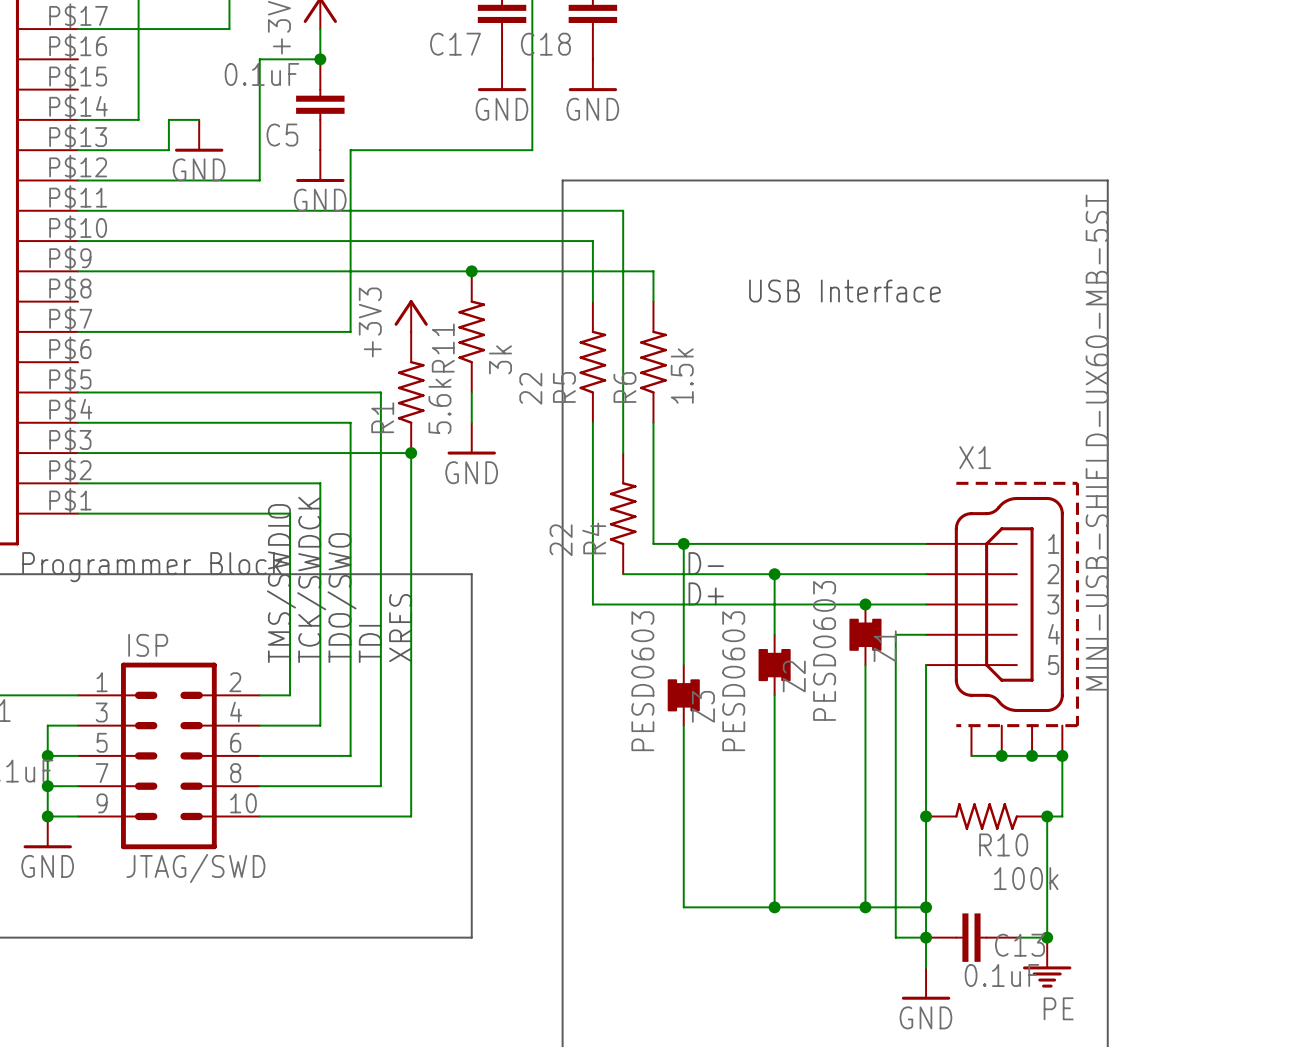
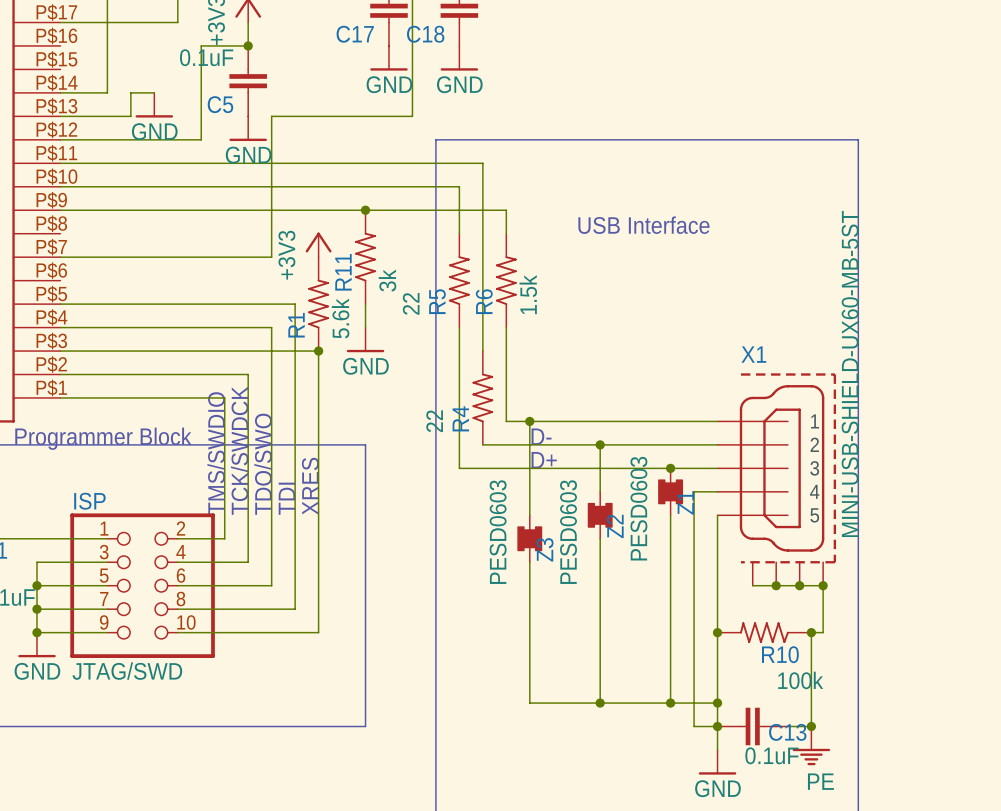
ISP: JTAG/SWD (168, 755) -> none
ISP: none -> JTAG/SWD (142, 585)

